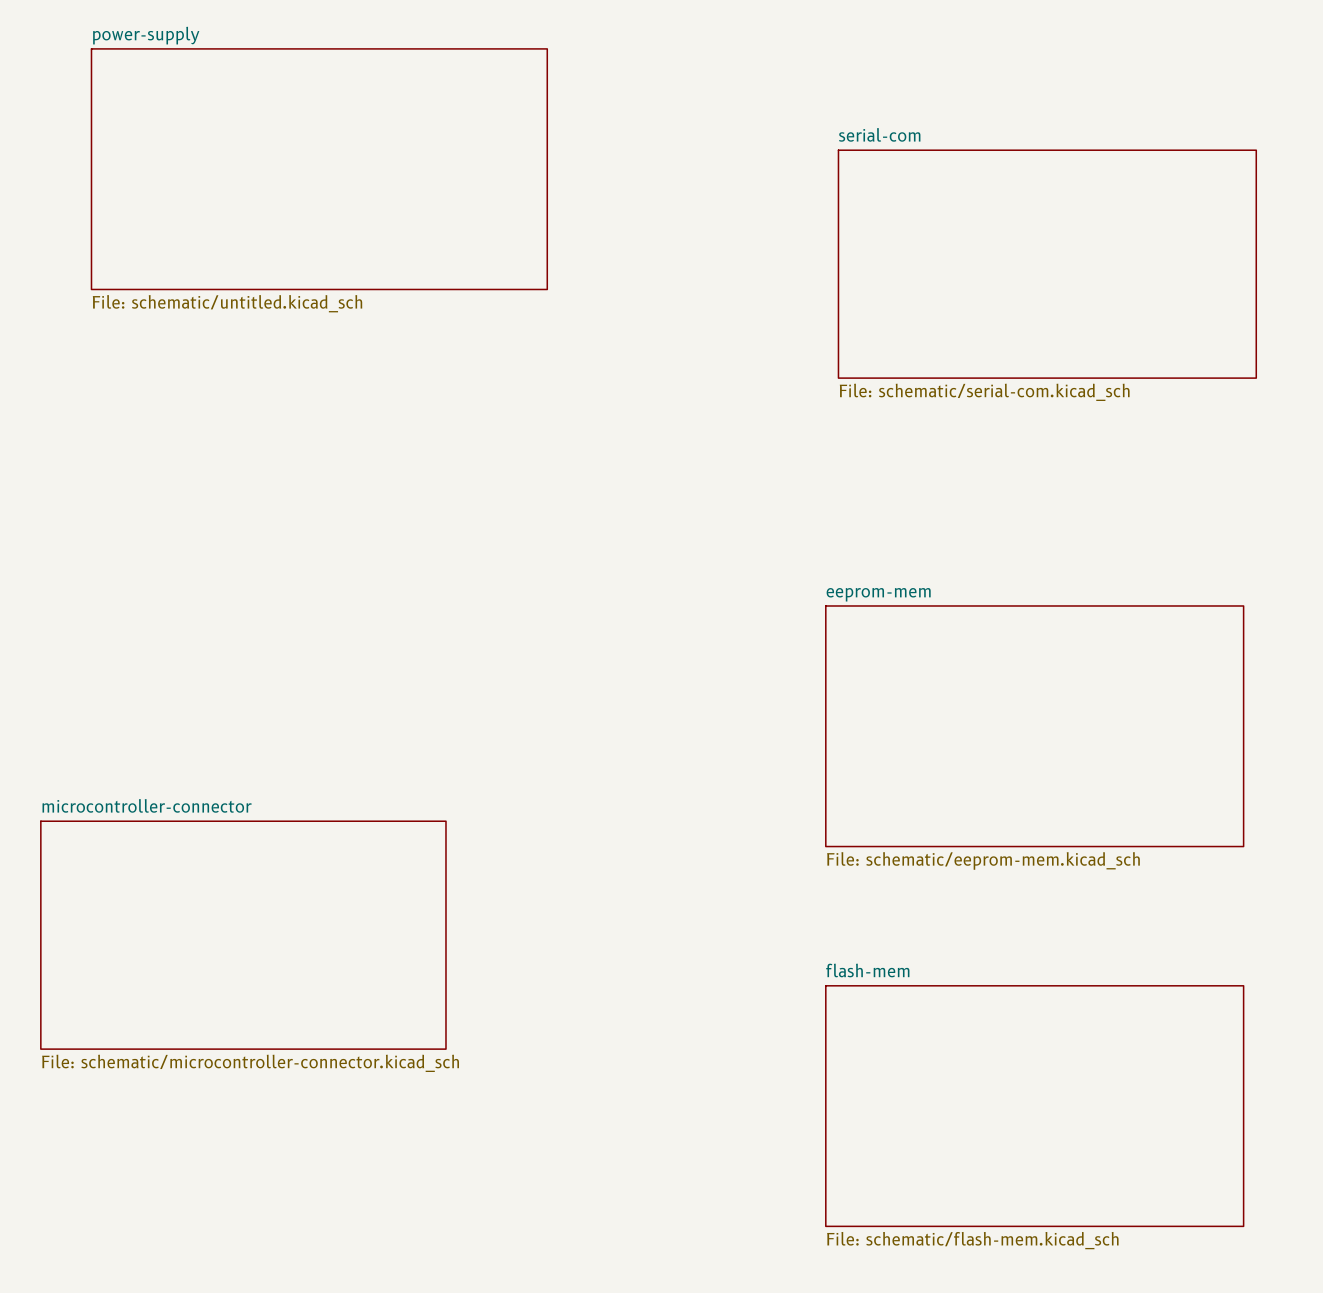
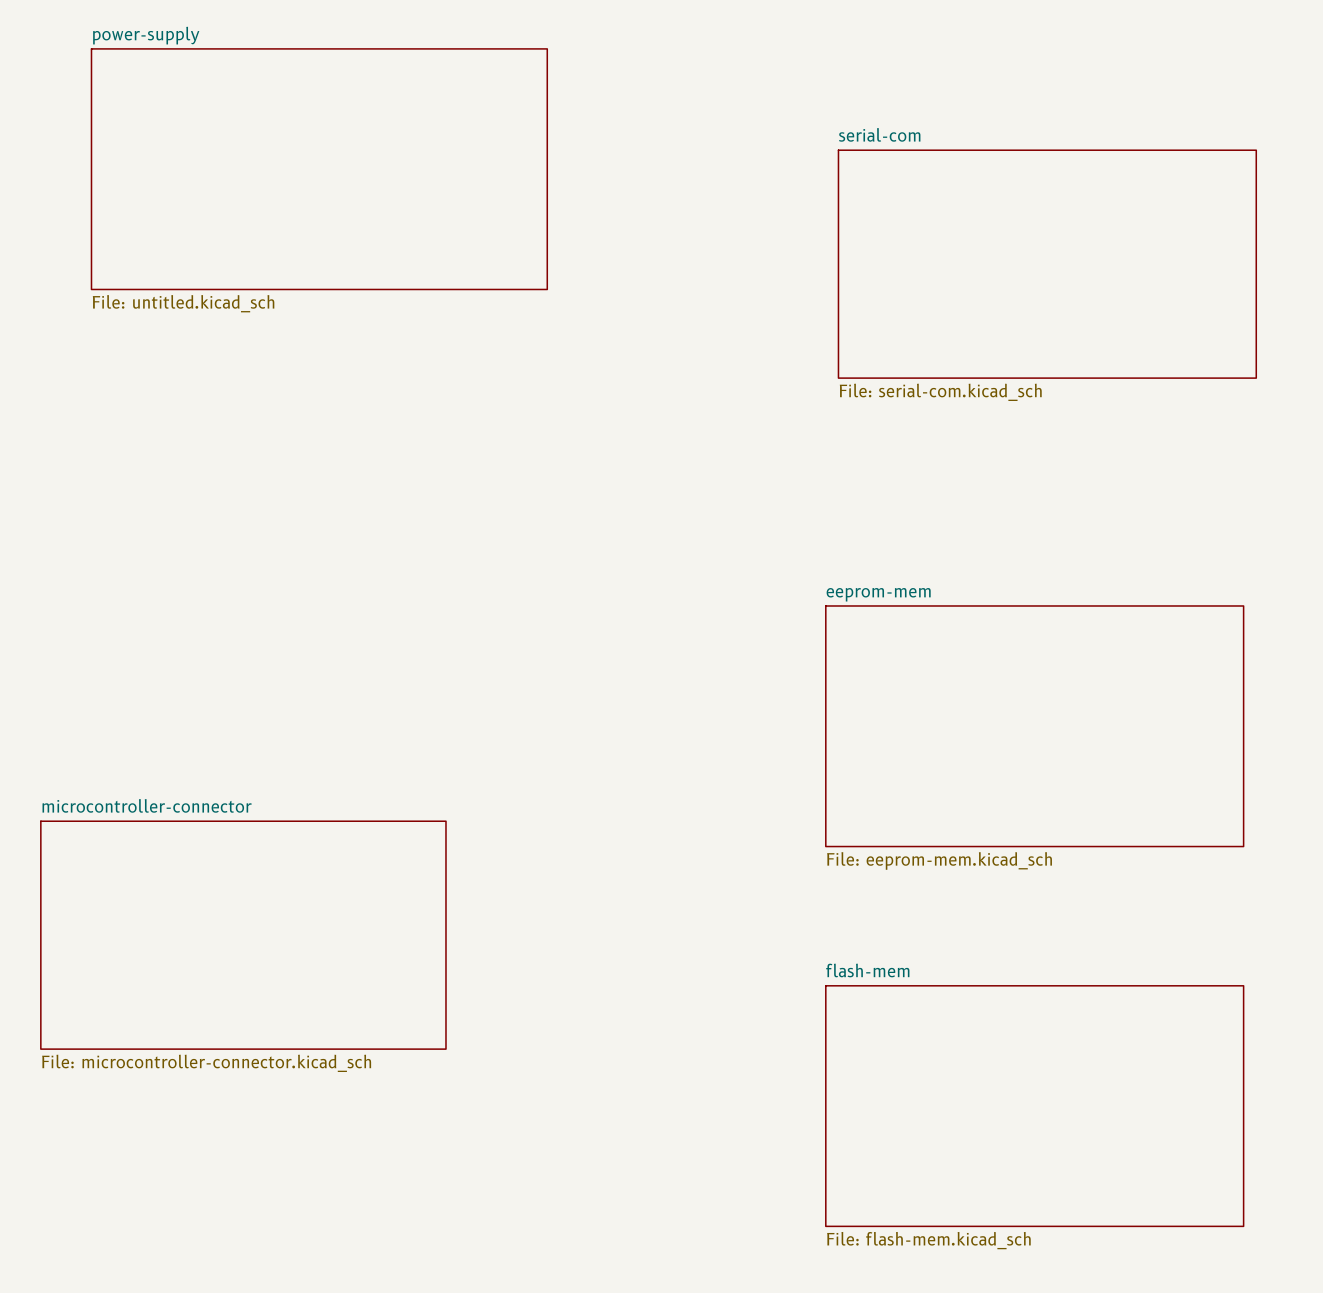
sheet power-supply value: File: schematic/untitled.kicad_sch (227, 303) -> File: untitled.kicad_sch (183, 303)
sheet serial-com value: File: schematic/serial-com.kicad_sch (984, 392) -> File: serial-com.kicad_sch (940, 392)
sheet eeprom-mem value: File: schematic/eeprom-mem.kicad_sch (983, 860) -> File: eeprom-mem.kicad_sch (939, 860)
sheet microcontroller-connector value: File: schematic/microcontroller-connector.kicad_sch (250, 1063) -> File: microcontroller-connector.kicad_sch (206, 1063)
sheet flash-mem value: File: schematic/flash-mem.kicad_sch (972, 1240) -> File: flash-mem.kicad_sch (928, 1240)

